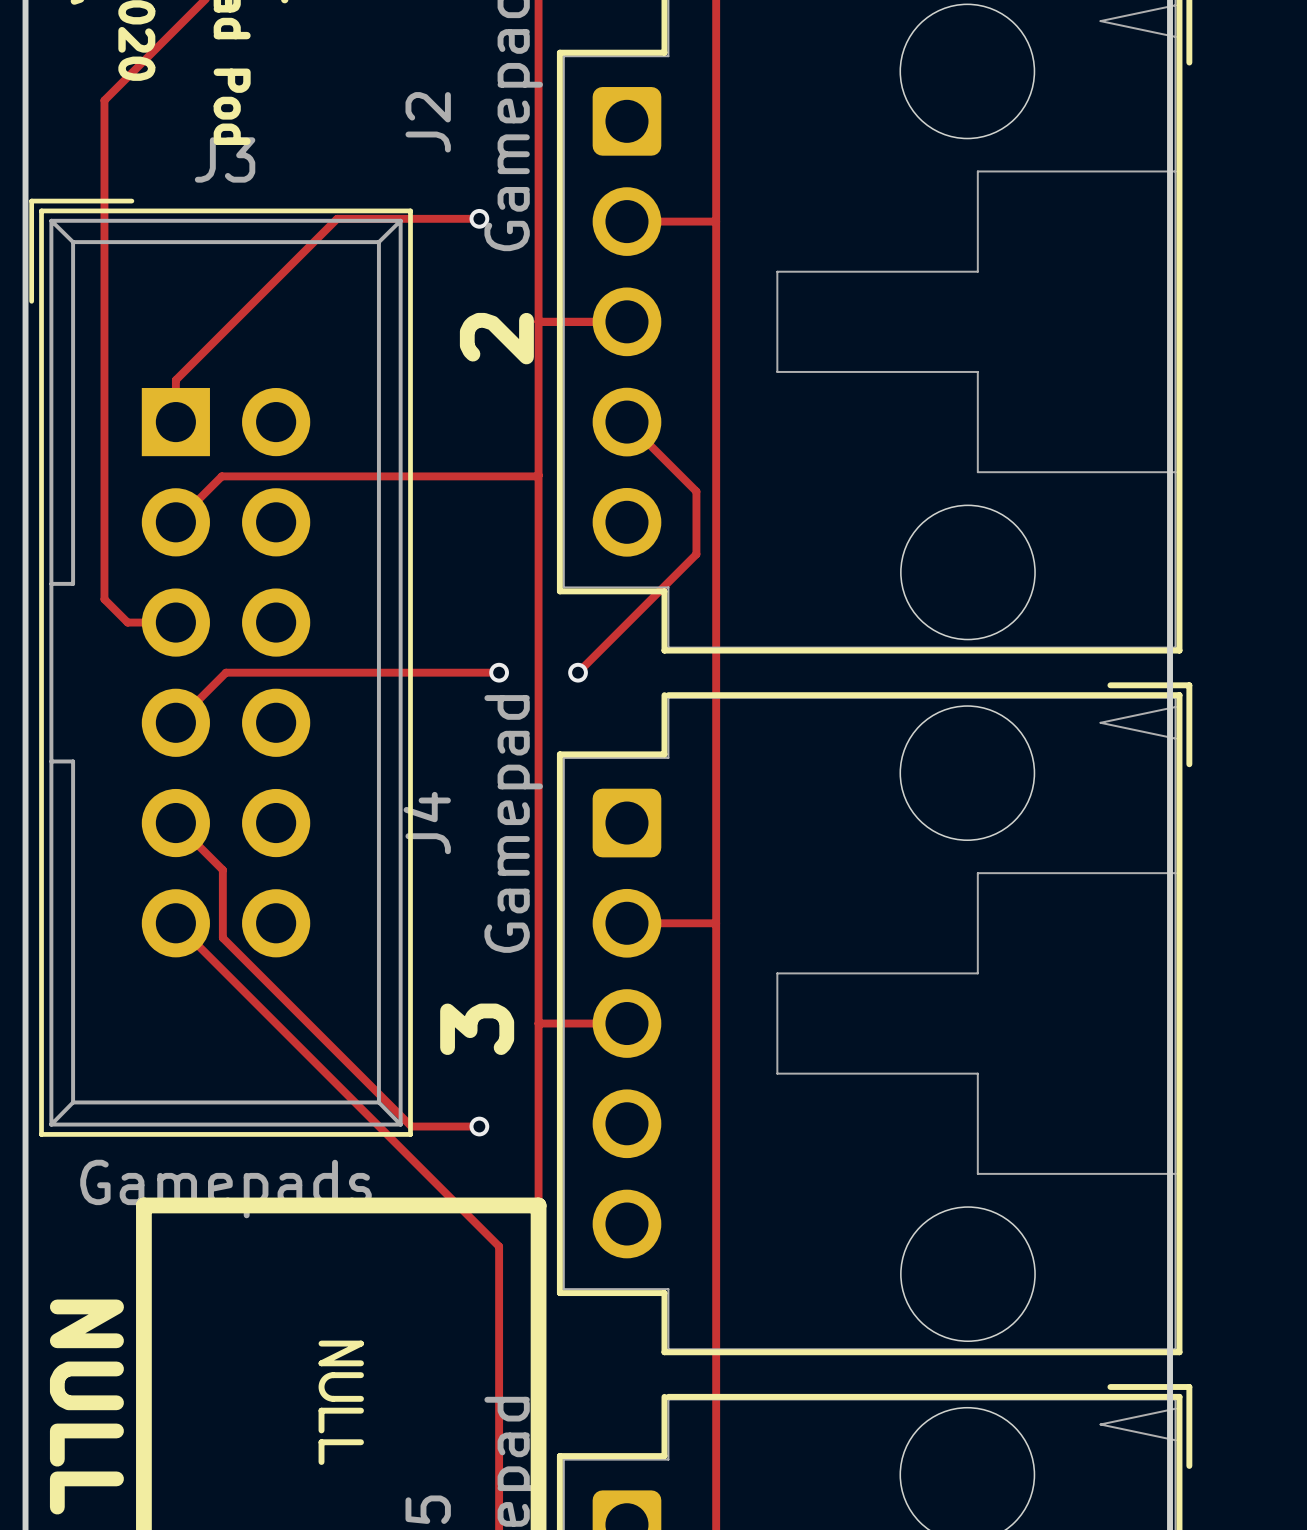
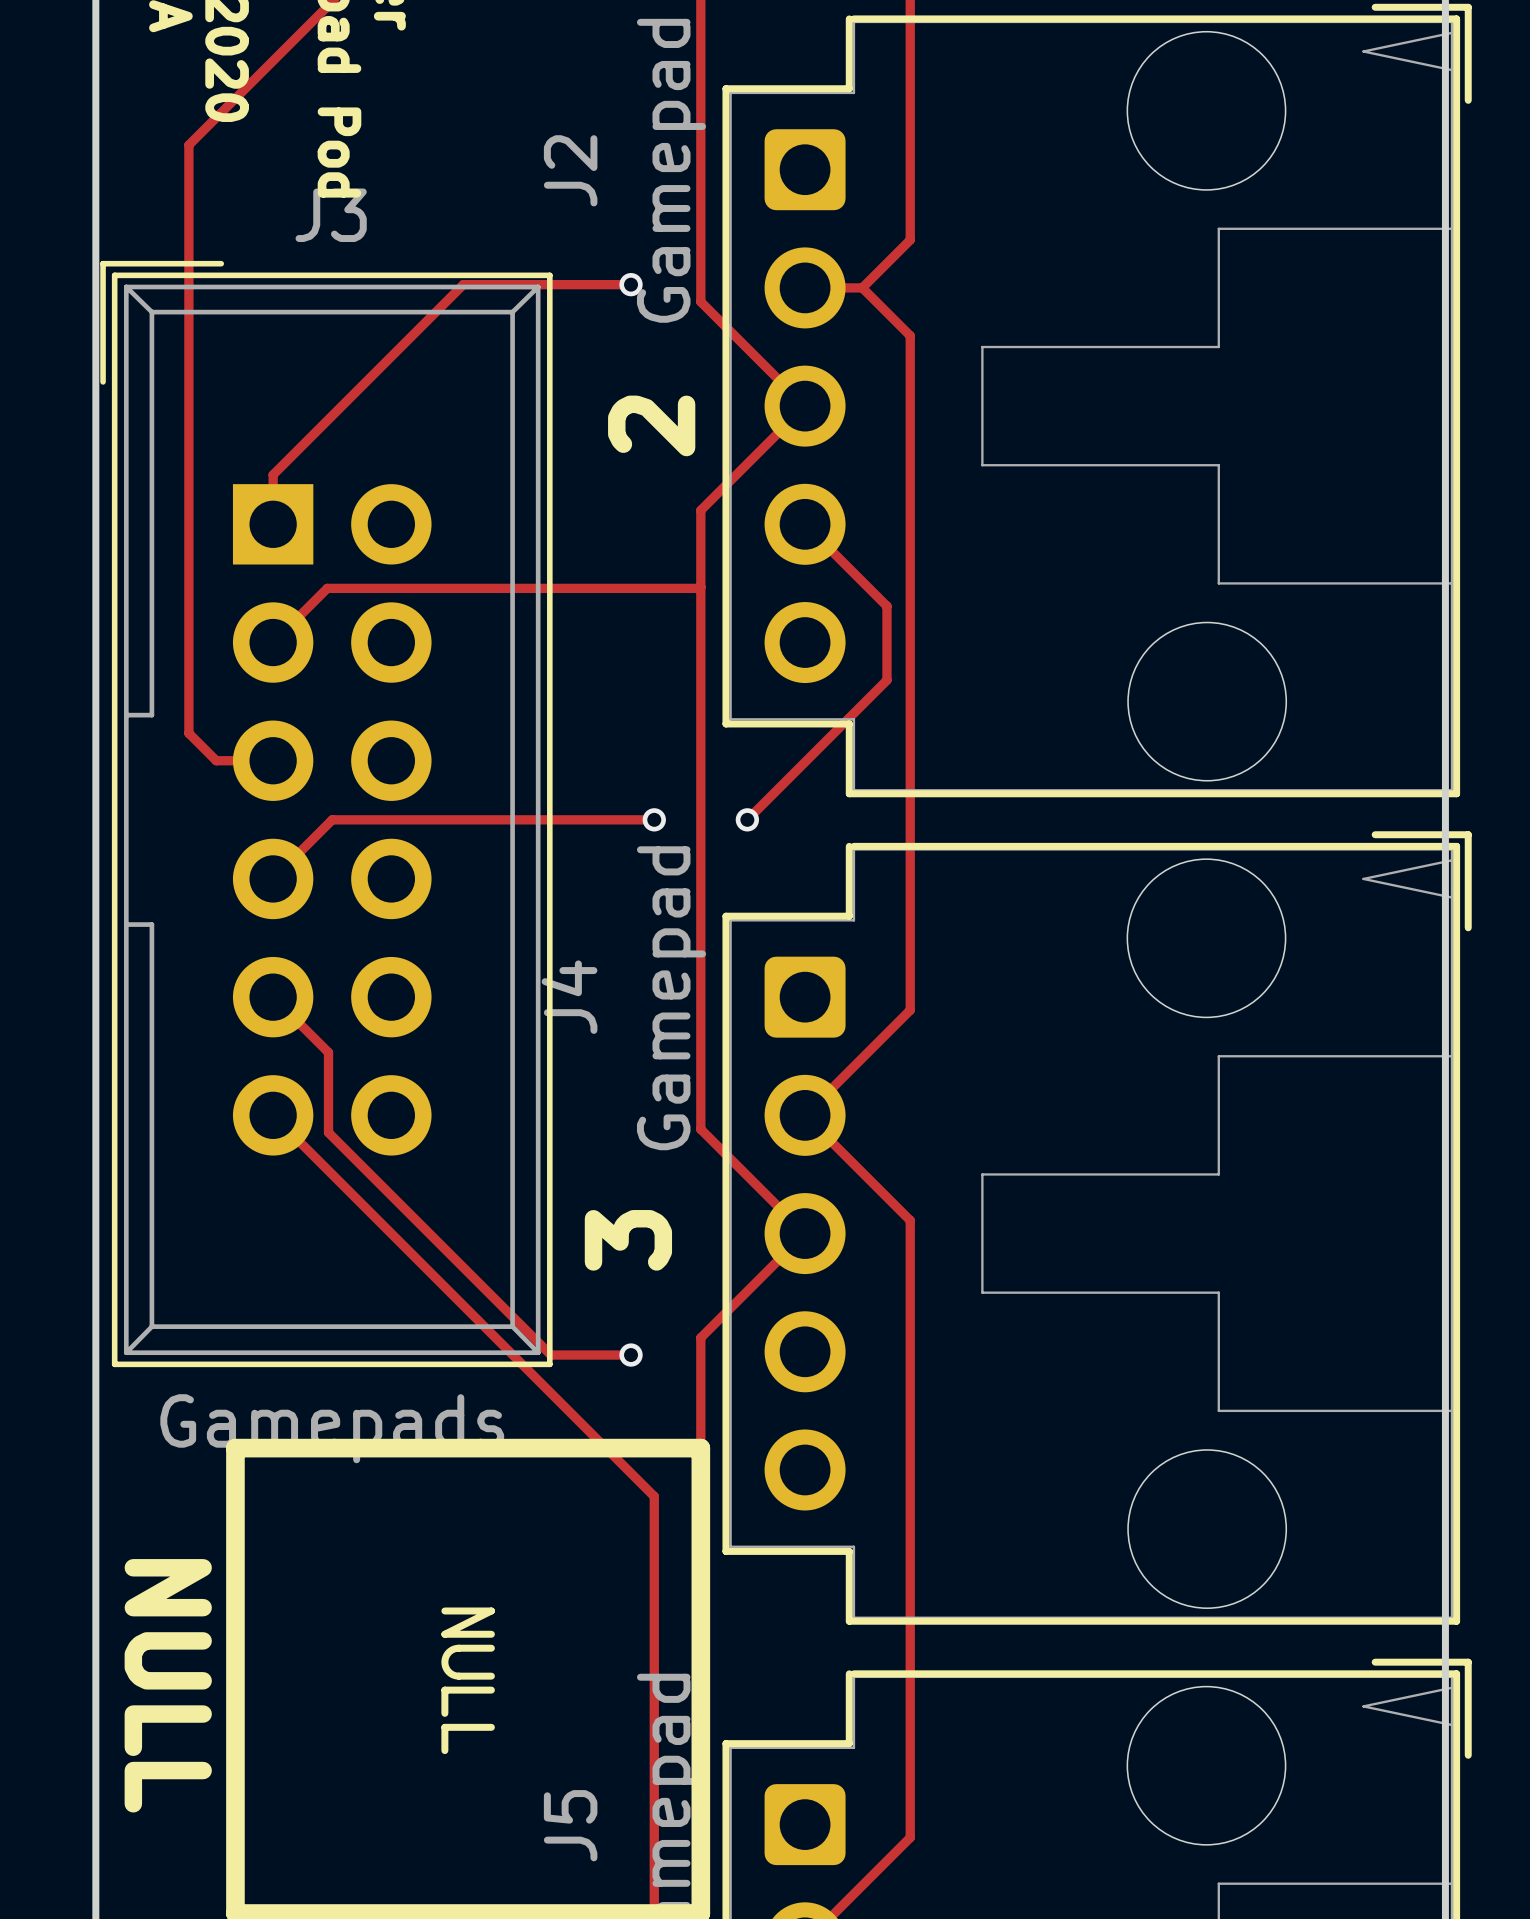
track: (716, 180) (716, 262) -> (910, 239) (862, 287) (910, 335)
track: (675, 221) (716, 221) -> none
track: (538, 233) (538, 410) -> (700, 301) (805, 406) (700, 510)
track: (538, 321) (626, 321) -> none
track: (716, 834) (716, 1012) -> (910, 1010) (805, 1115) (910, 1220)
track: (626, 923) (716, 923) -> none
track: (538, 935) (538, 1111) -> (700, 1129) (805, 1233) (700, 1337)
track: (538, 1023) (626, 1023) -> none

